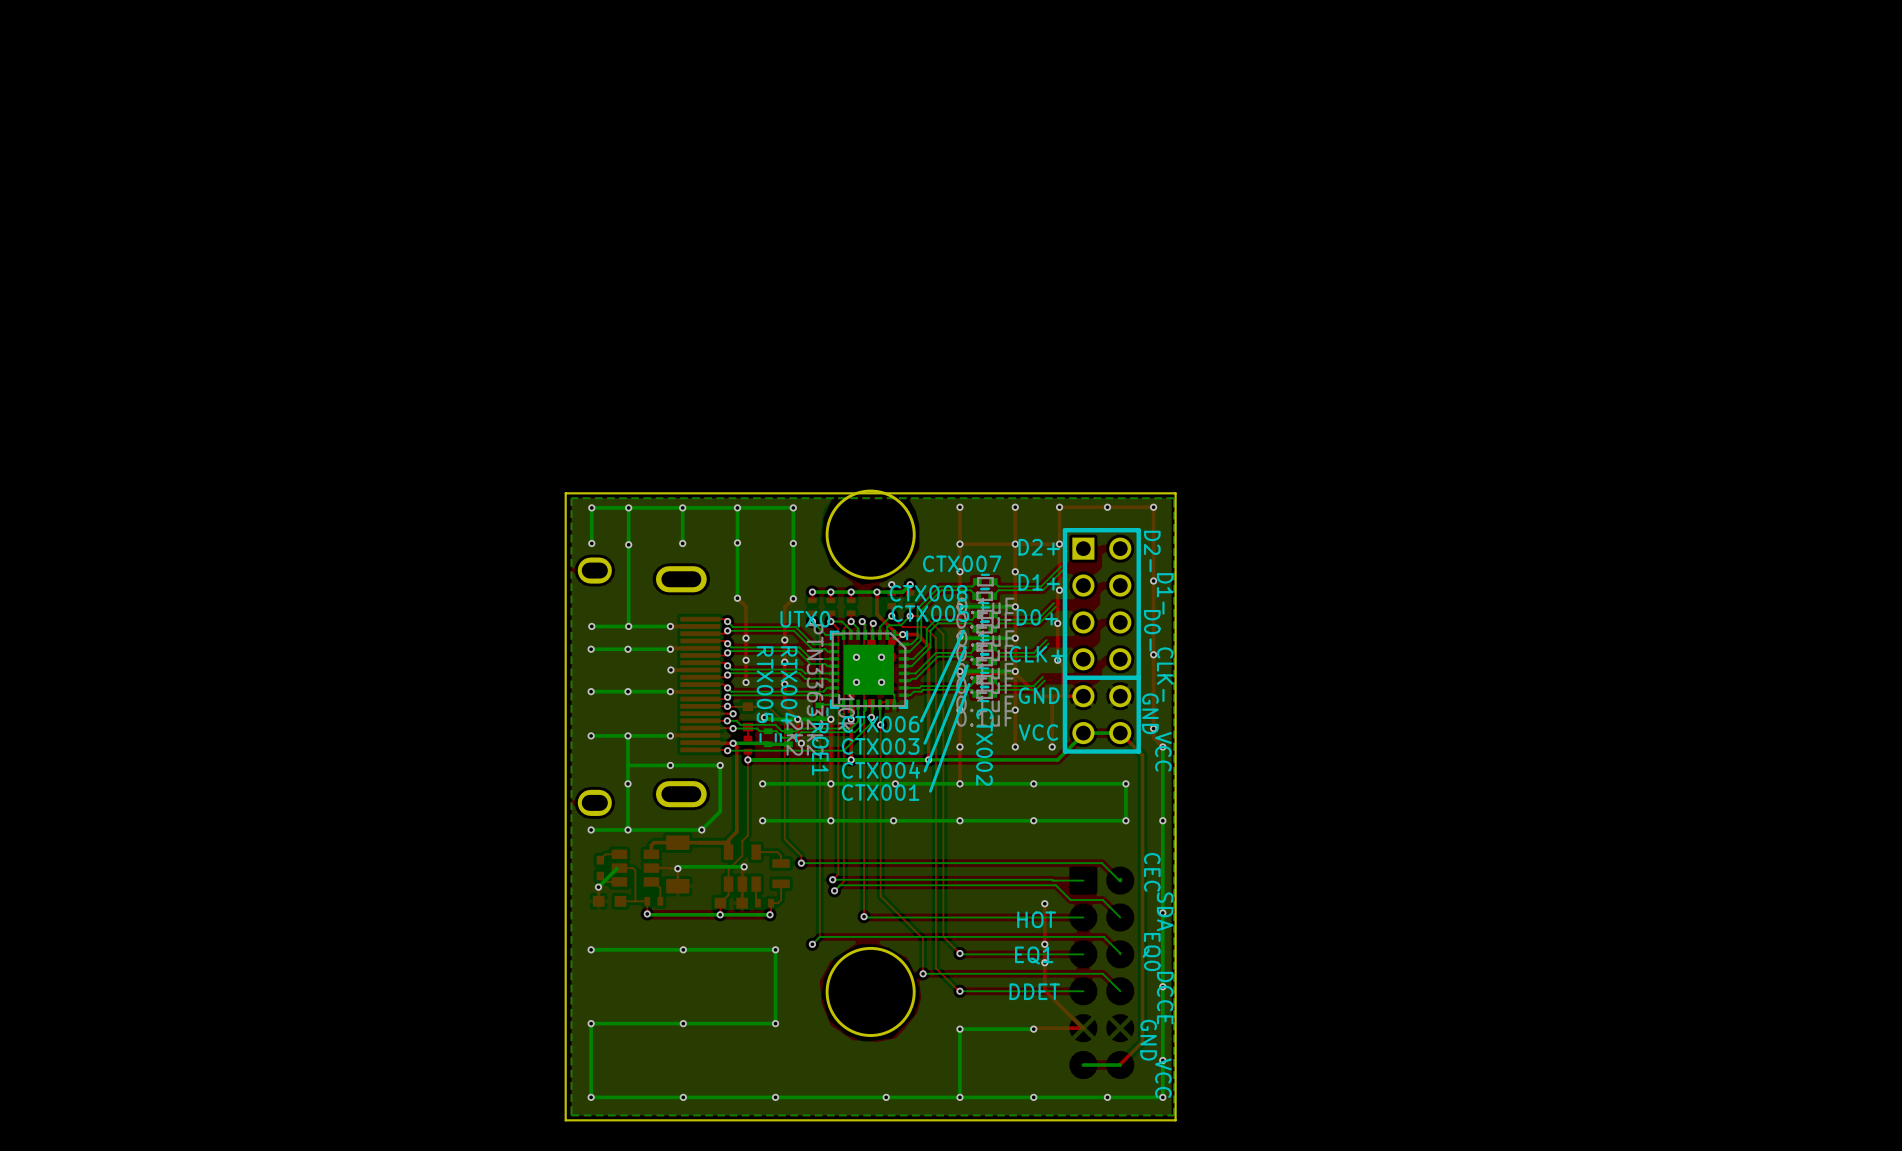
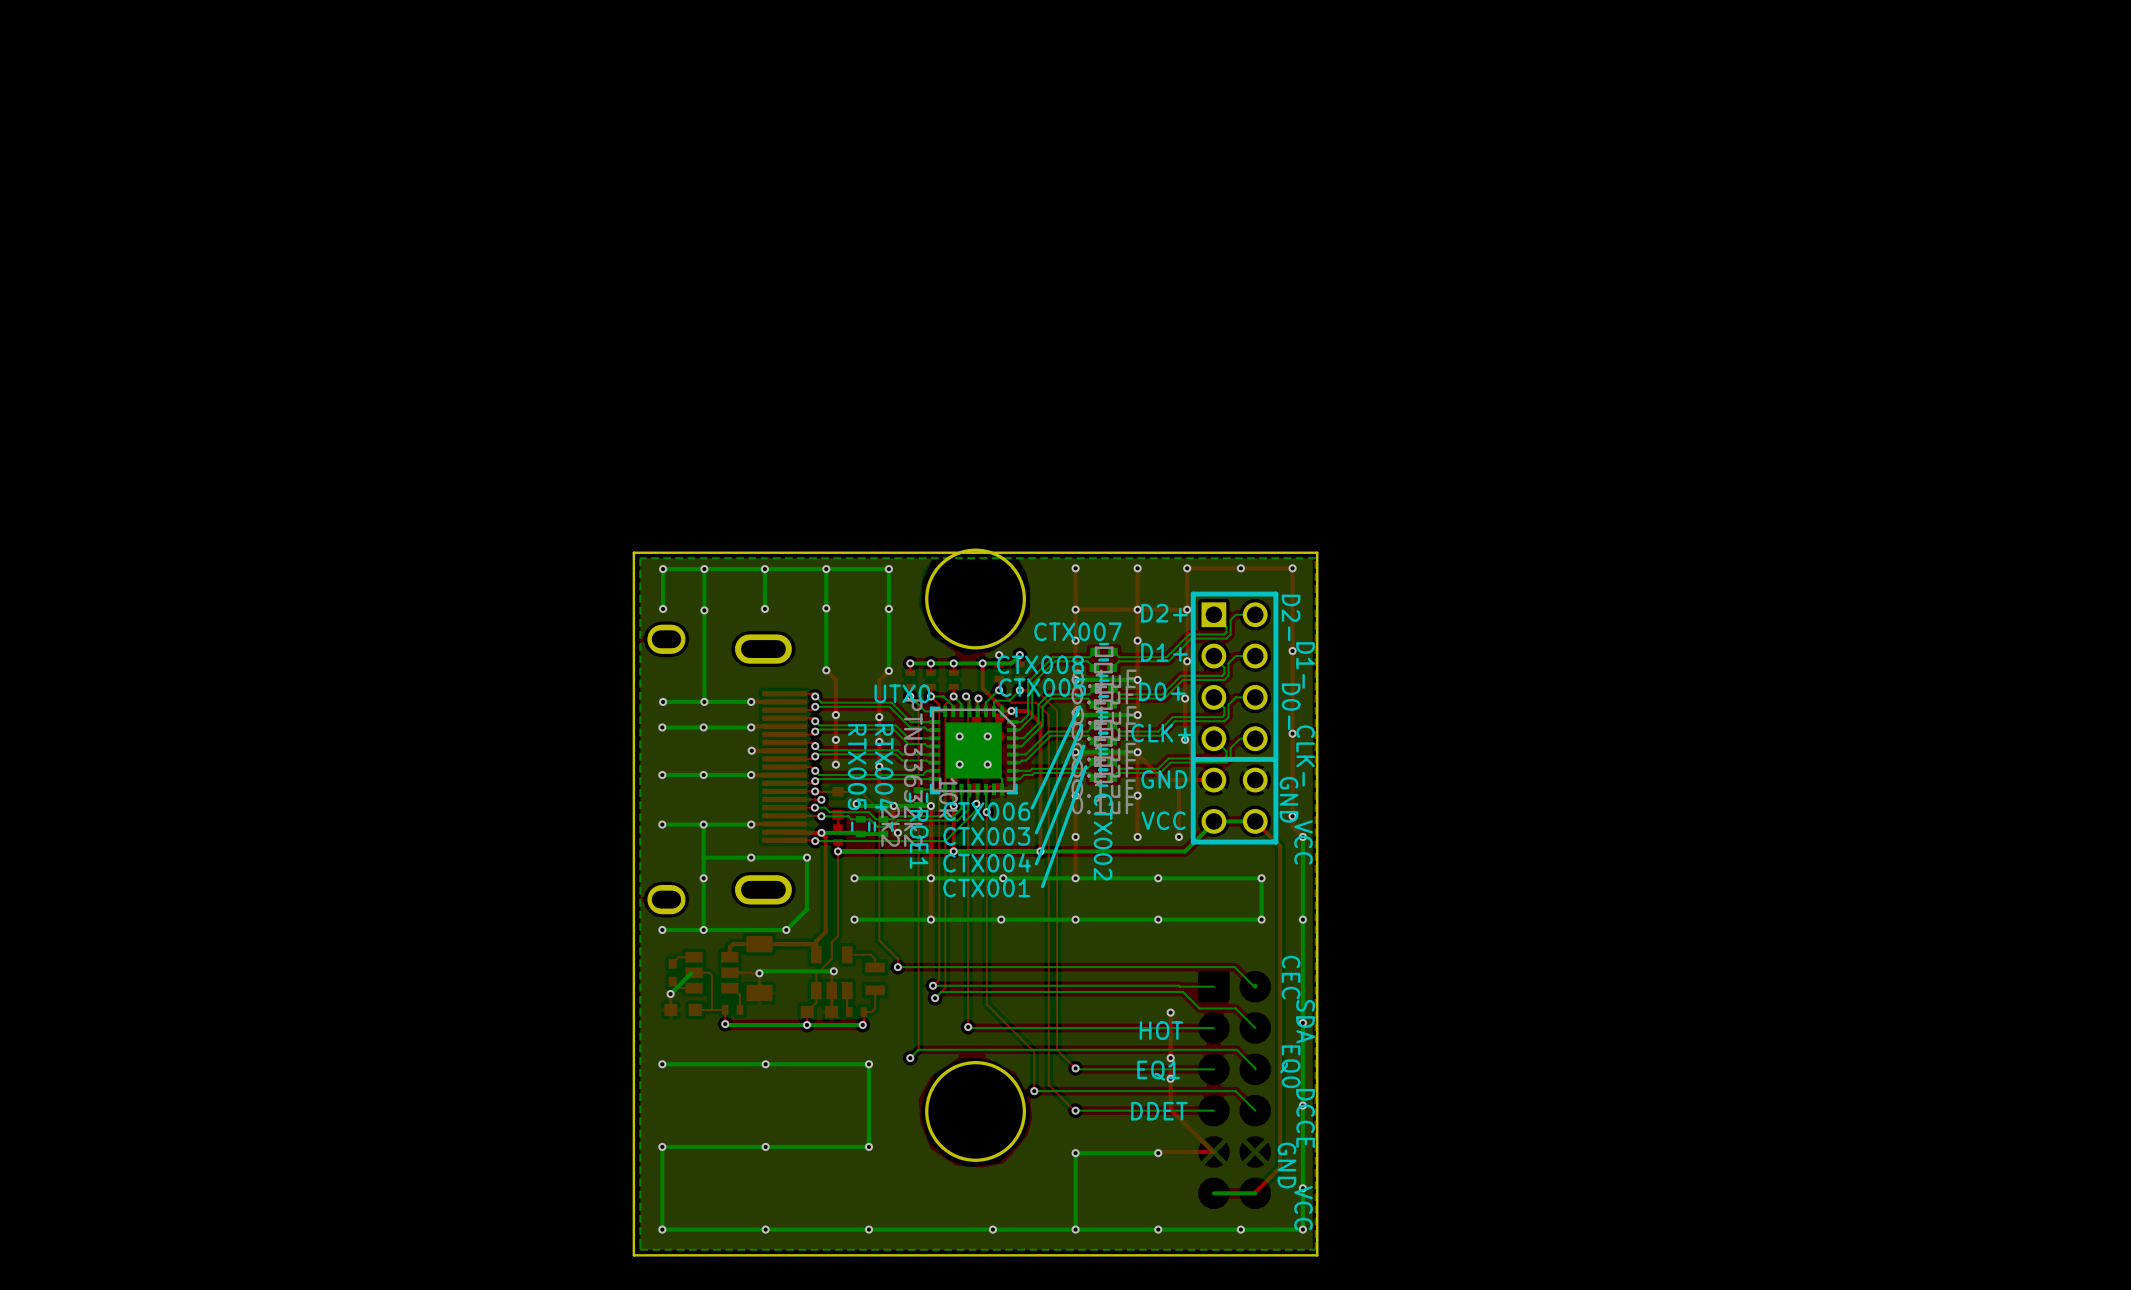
bottom track: none -> (1213, 614) (1226, 627) (1224, 634) (1189, 634)
bottom track: none -> (1255, 614) (1235, 614) (1230, 620) (1230, 634) (1226, 638) (1191, 638)
bottom track: none -> (1213, 656) (1224, 667) (1224, 673) (1222, 675) (1180, 675)
bottom track: none -> (1255, 656) (1235, 656) (1228, 663) (1228, 675) (1224, 679) (1183, 679)
bottom track: none -> (1213, 697) (1224, 707) (1224, 715) (1222, 717) (1172, 717)
bottom track: none -> (1255, 697) (1235, 697) (1228, 704) (1228, 717) (1224, 721) (1174, 721)
bottom track: none -> (1213, 738) (1226, 751) (1224, 758) (1168, 758)
bottom track: none -> (1255, 738) (1239, 738) (1230, 748) (1230, 758) (1226, 762) (1170, 762)

